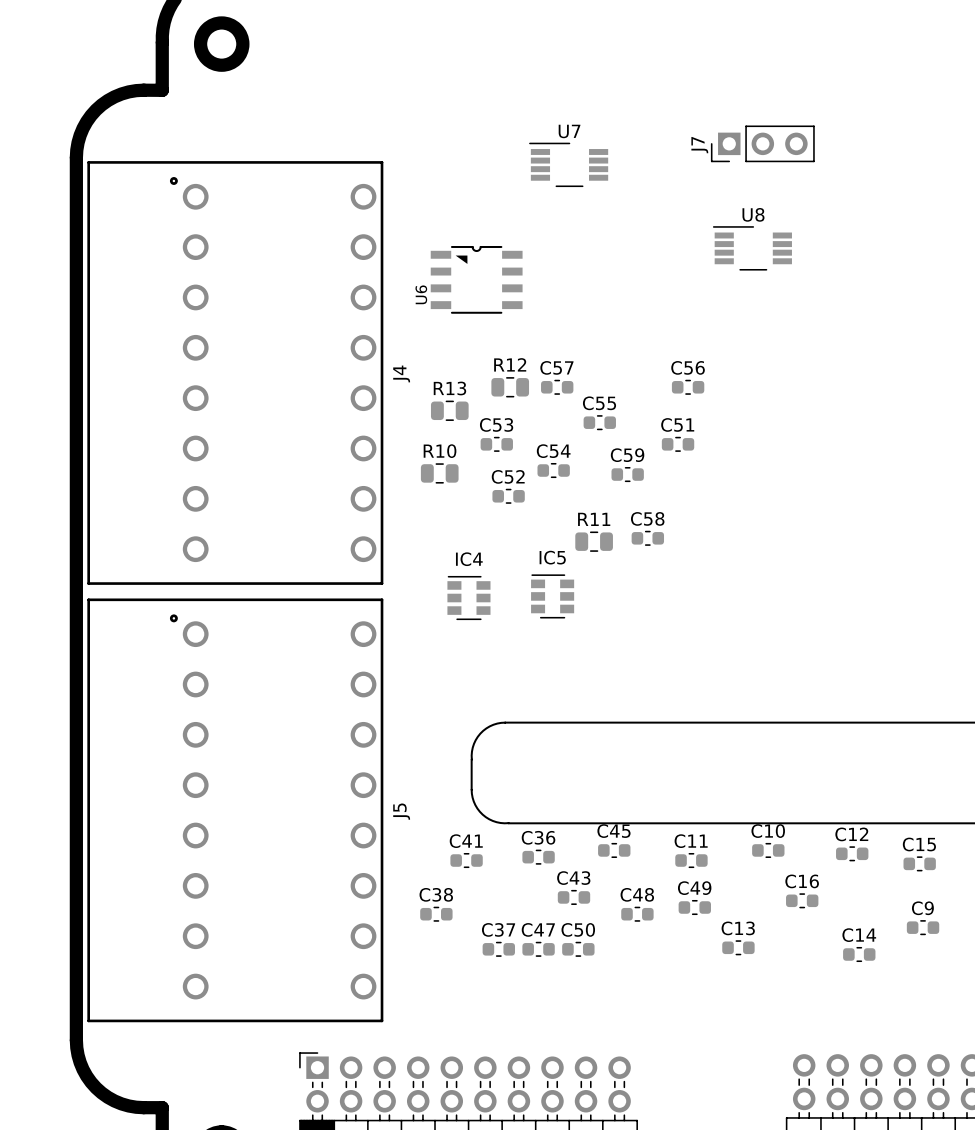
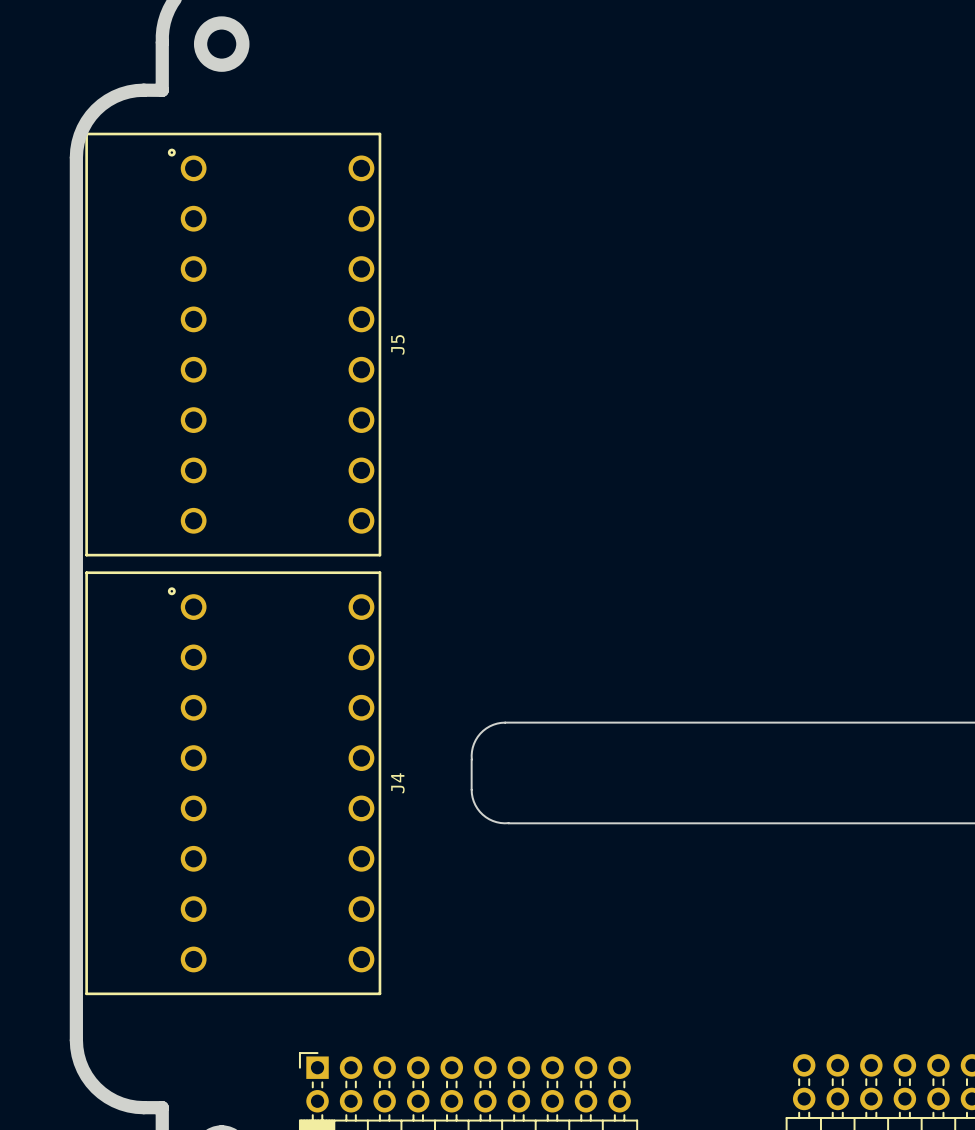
J7: (762, 143) -> none
U7: (568, 164) -> none
U8: (752, 248) -> none
U6: (476, 279) -> none
J4 position: (235, 372) -> (233, 783)
R12: (510, 387) -> none
C57: (557, 387) -> none
C56: (688, 387) -> none
R13: (449, 410) -> none
C55: (599, 422) -> none
C53: (496, 444) -> none
C51: (678, 444) -> none
C54: (553, 470) -> none
R10: (439, 473) -> none
C59: (627, 474) -> none
C52: (508, 496) -> none
C58: (647, 538) -> none
R11: (594, 541) -> none
IC5: (552, 596) -> none
IC4: (468, 598) -> none
J5 position: (235, 810) -> (233, 344)
C45: (614, 850) -> none
C10: (768, 850) -> none
C12: (852, 853) -> none
C36: (538, 857) -> none
C41: (466, 860) -> none
C11: (691, 860) -> none
C15: (919, 863) -> none
C43: (573, 897) -> none
C16: (802, 900) -> none
C49: (694, 907) -> none
C38: (436, 914) -> none
C48: (637, 914) -> none
C9: (923, 927) -> none
C13: (738, 947) -> none
C37: (498, 949) -> none
C47: (538, 949) -> none
C50: (578, 949) -> none
C14: (859, 954) -> none

